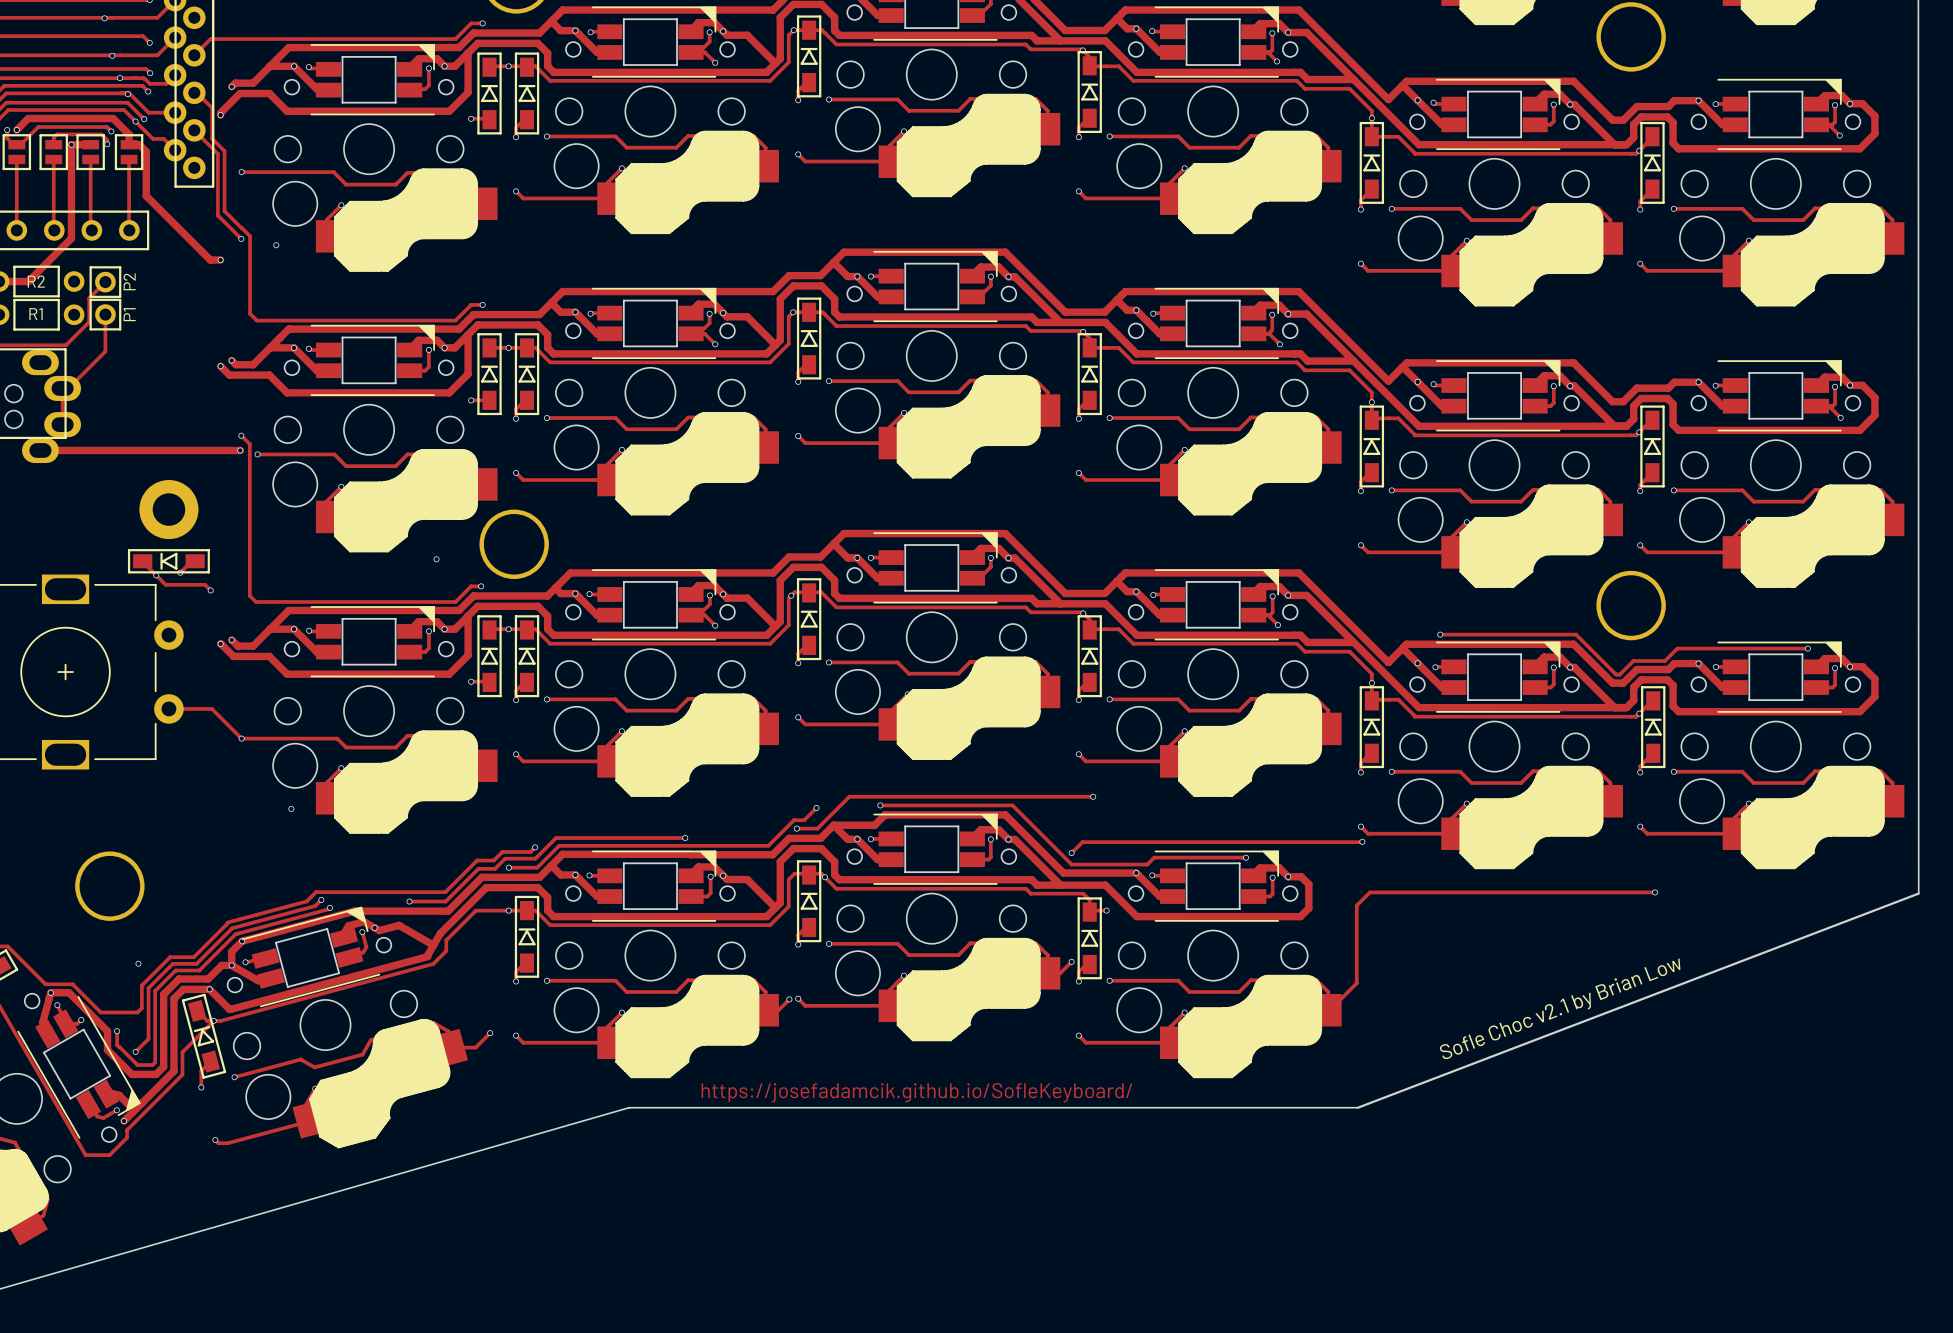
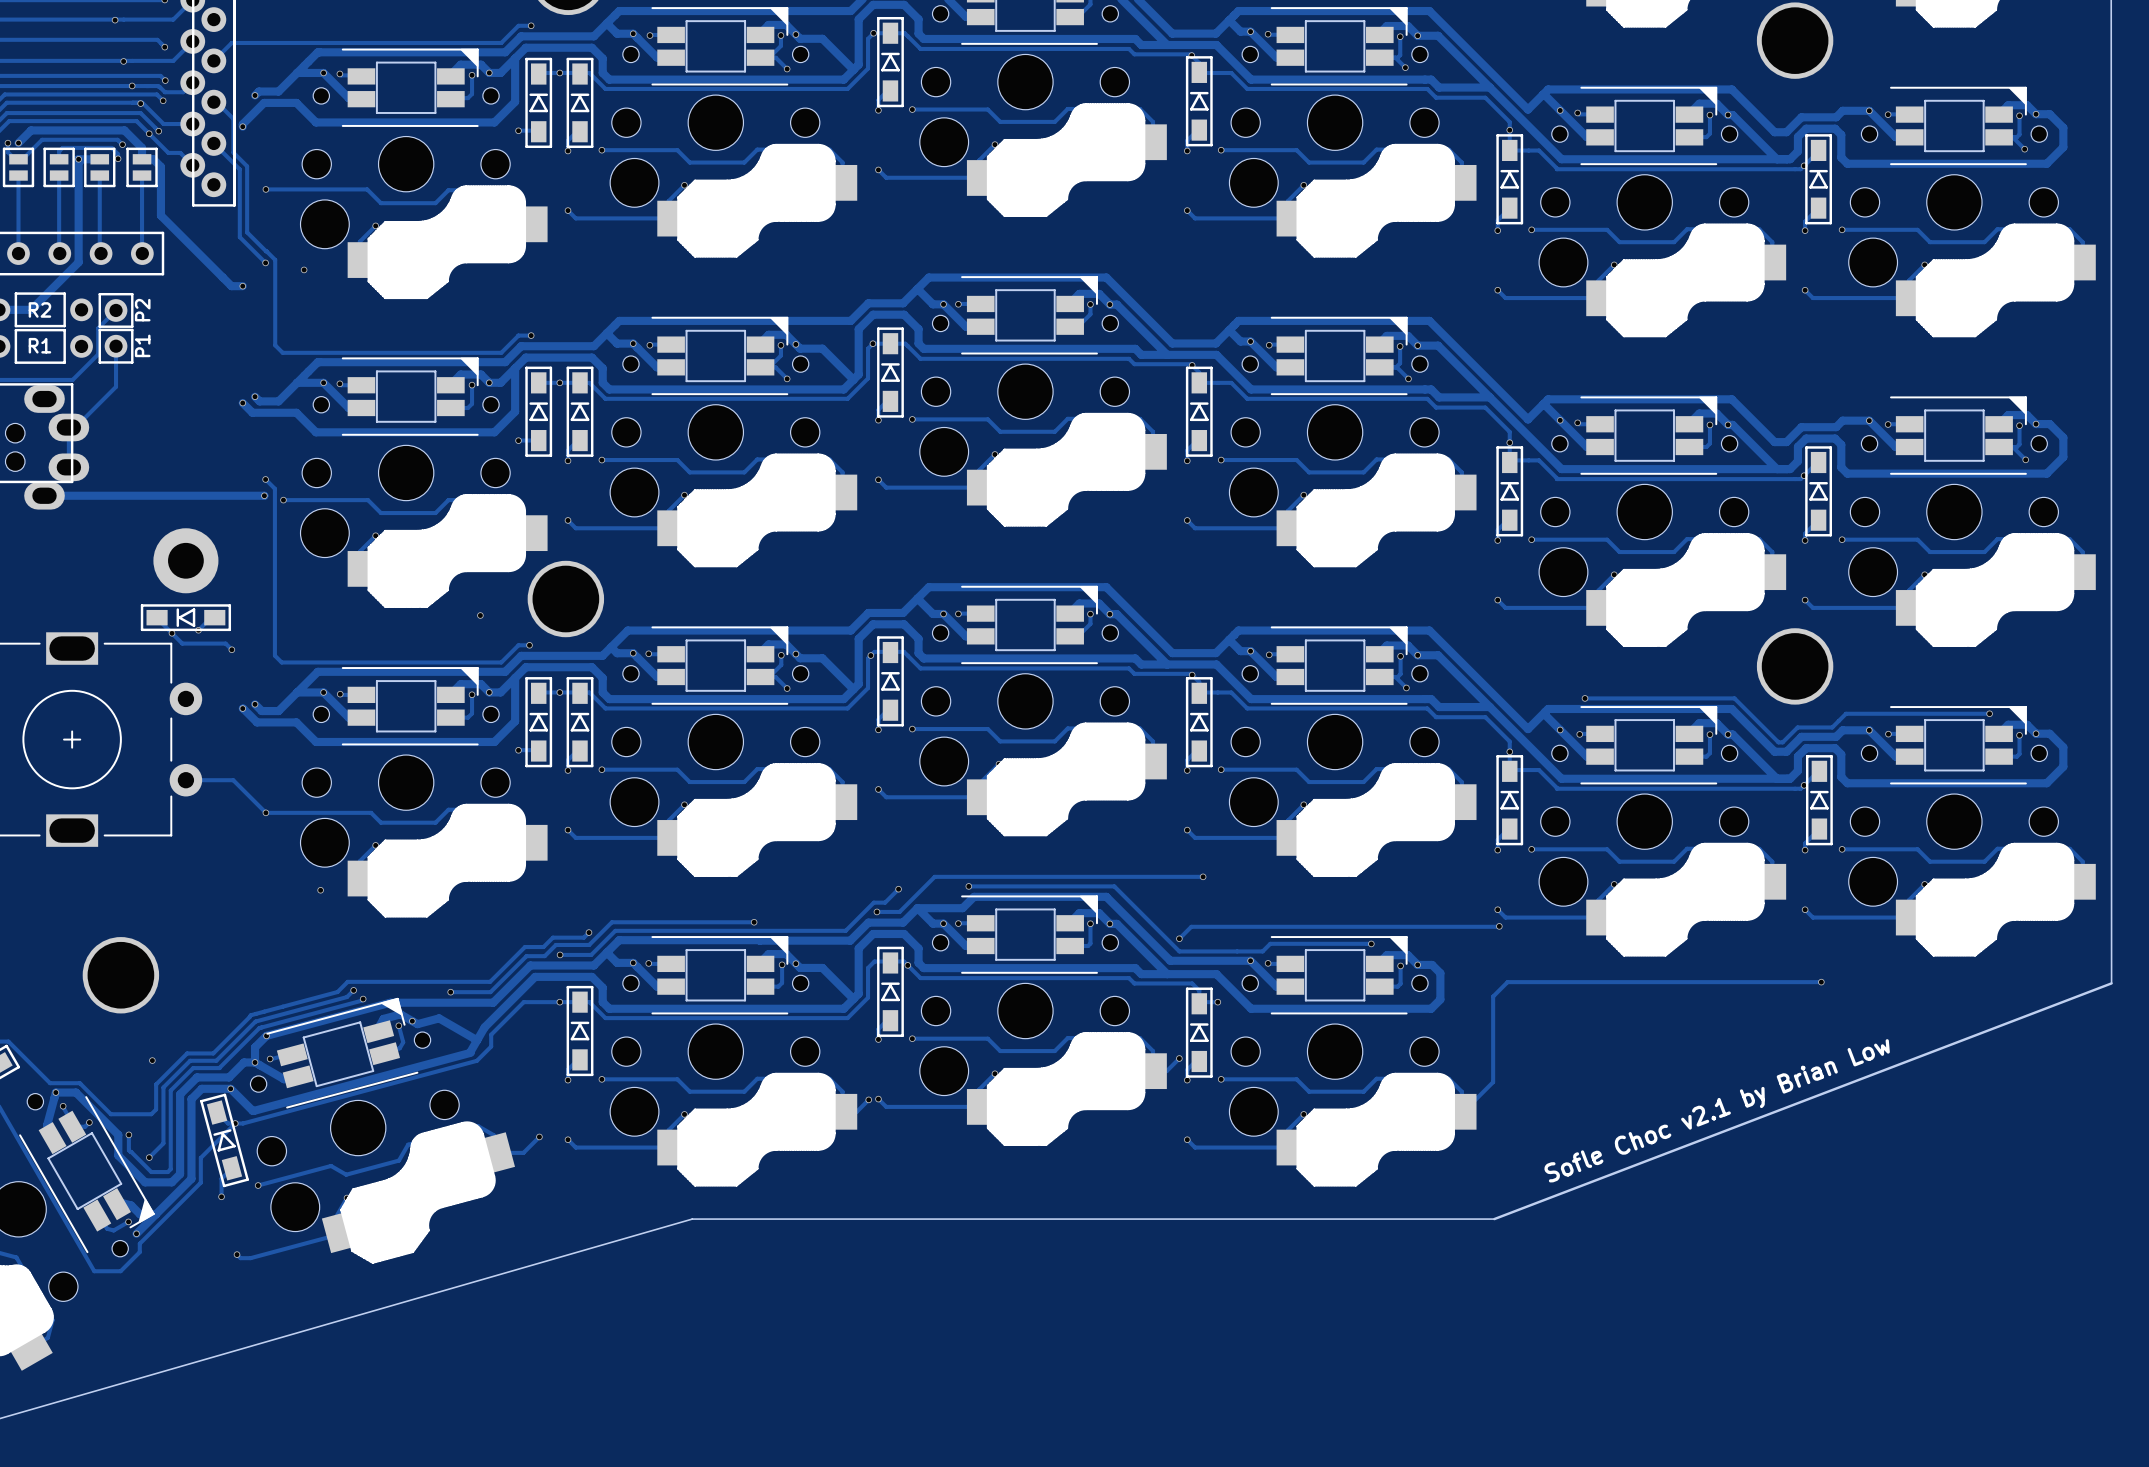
text: https://josefadamcik.github.io/SofleKeyboard/ (916, 1092) -> none

